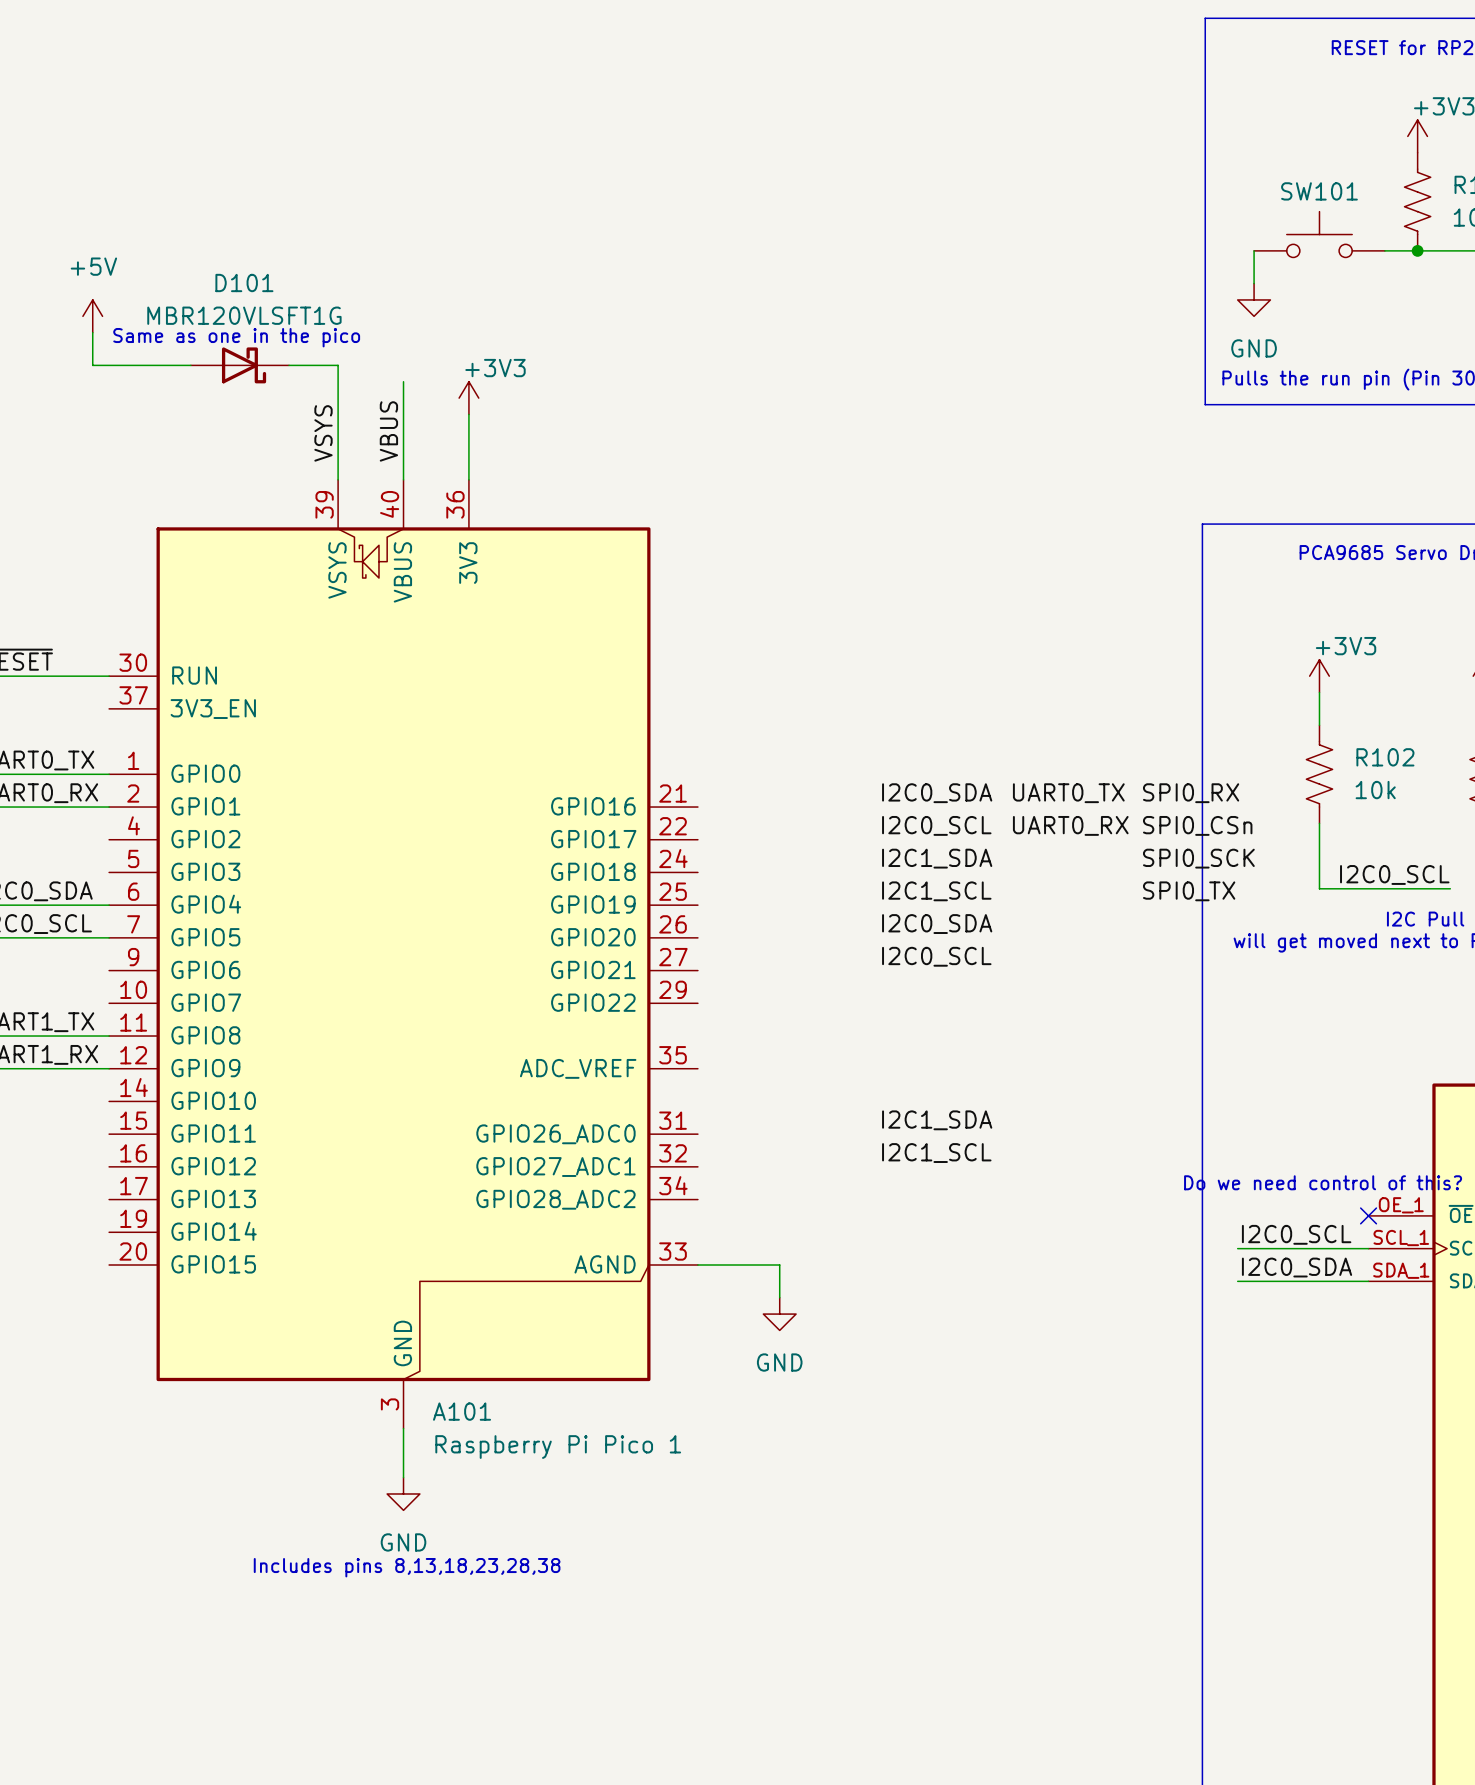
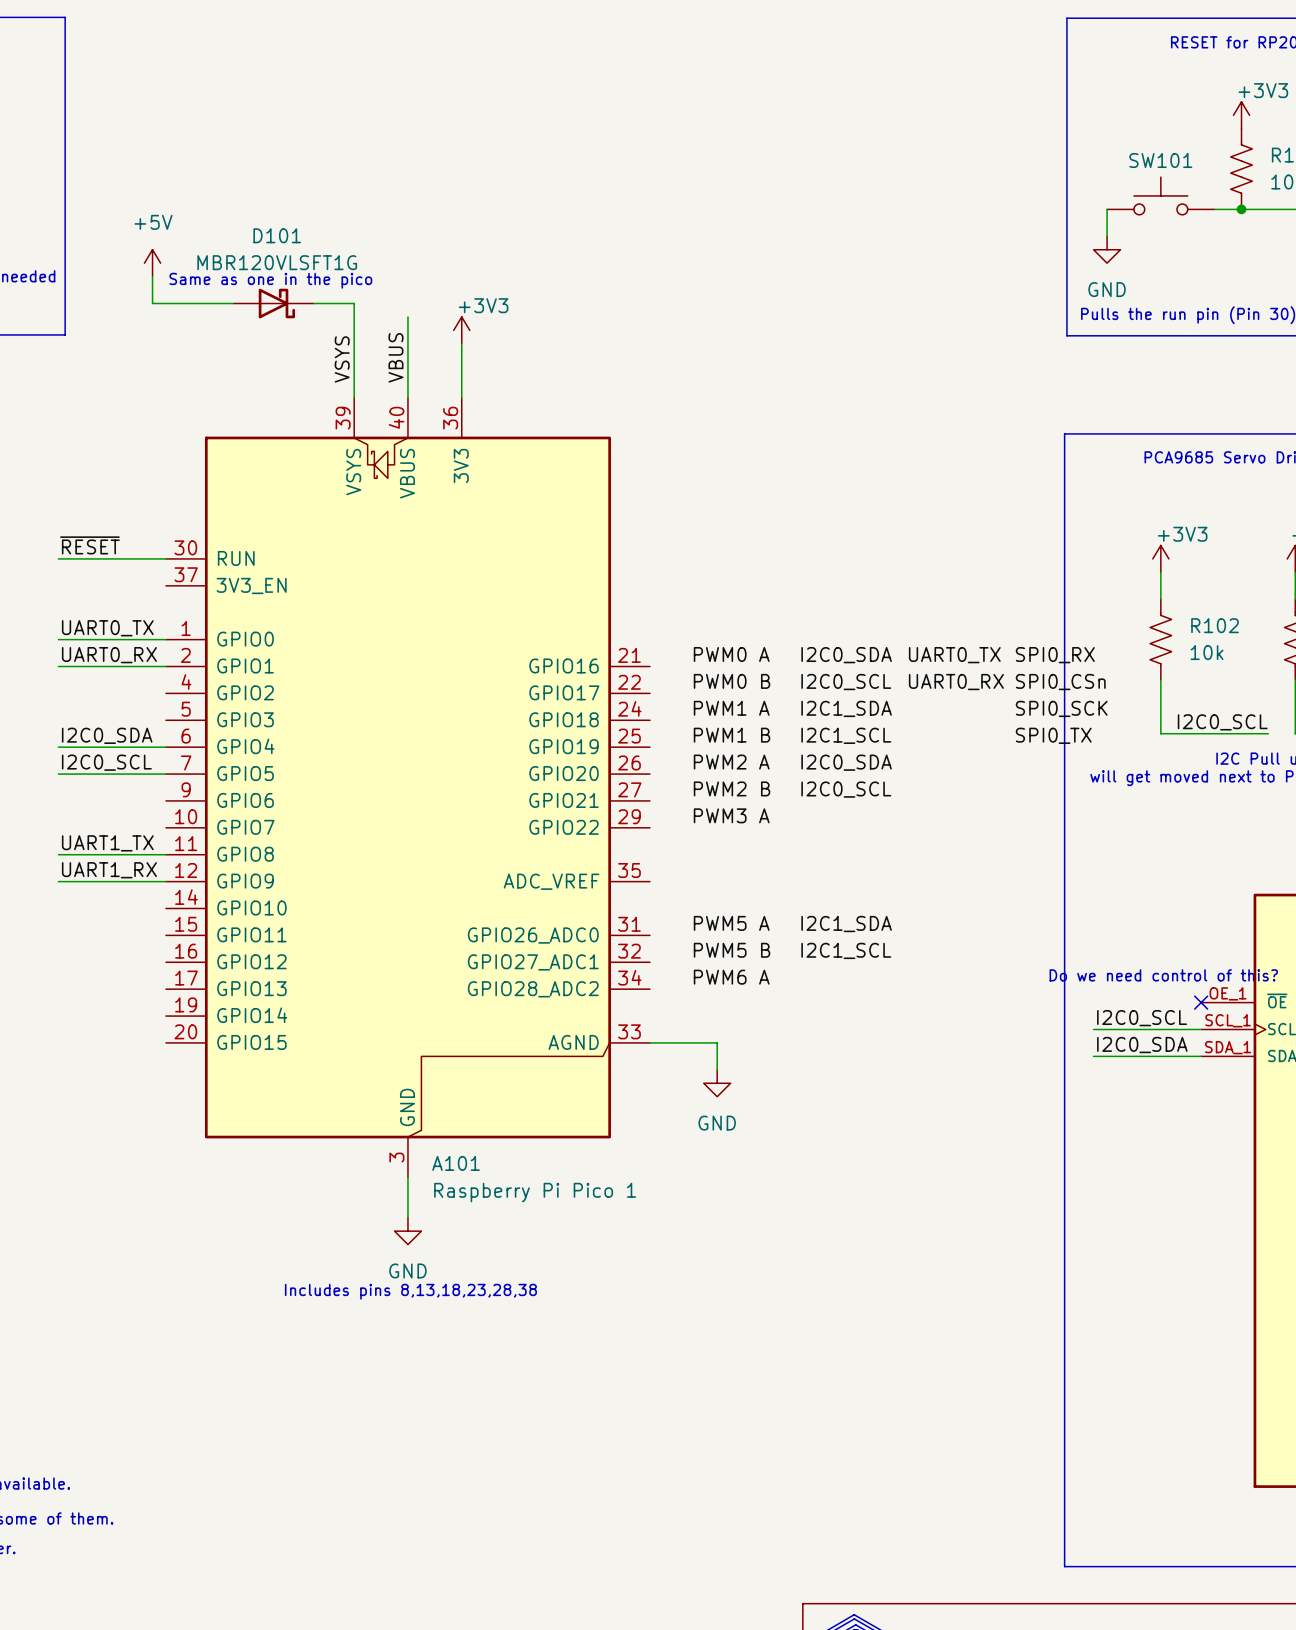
label: none -> PWM0 A (731, 654)
label: none -> PWM0 B (732, 681)
label: none -> PWM1 A (731, 708)
label: none -> PWM1 B (732, 735)
label: none -> PWM2 A (731, 762)
label: none -> PWM2 B (732, 788)
label: none -> PWM3 A (731, 815)
label: none -> PWM5 A (731, 923)
label: none -> PWM5 B (732, 950)
label: none -> PWM6 A (731, 977)

